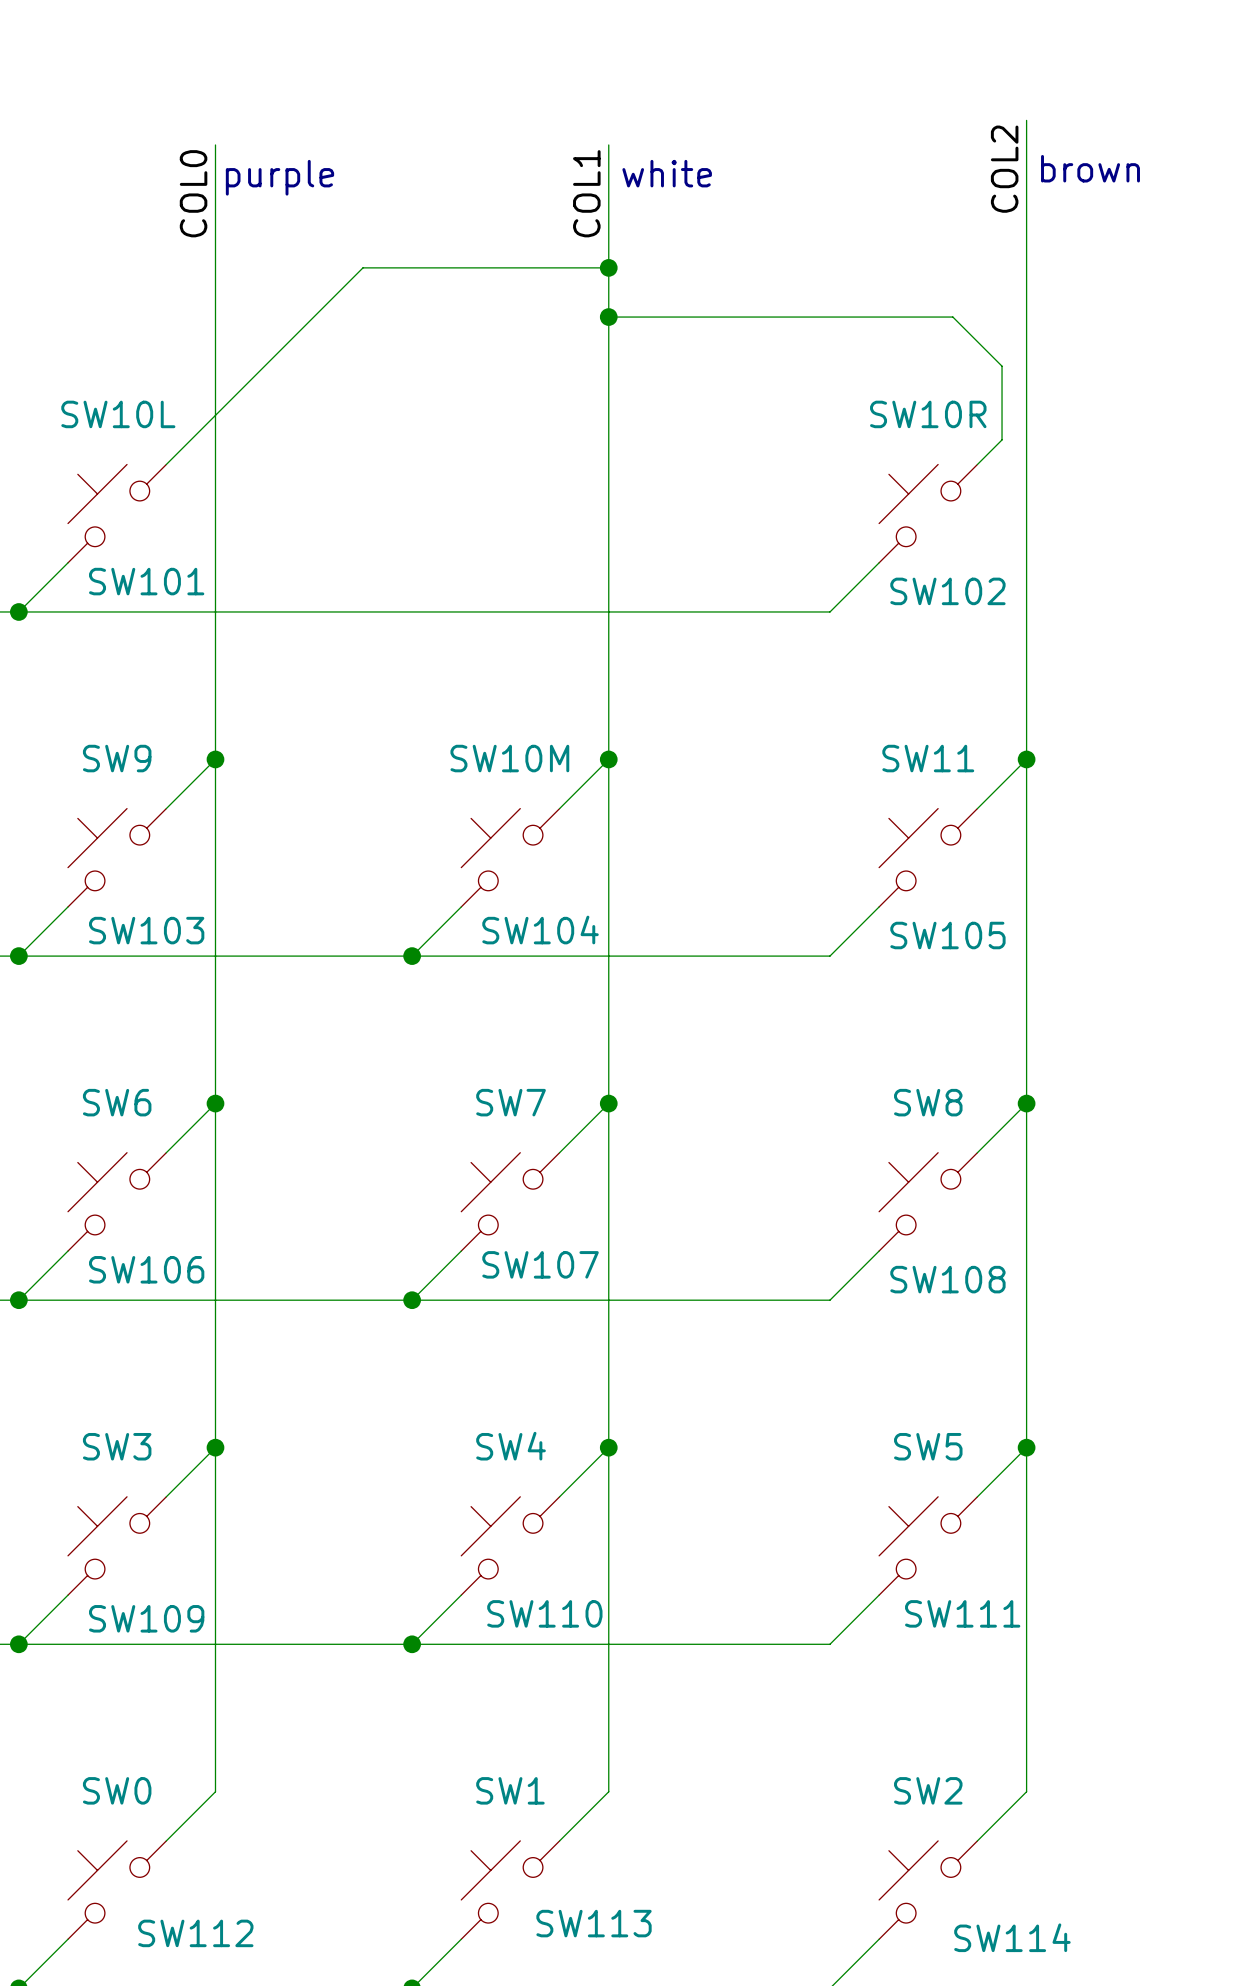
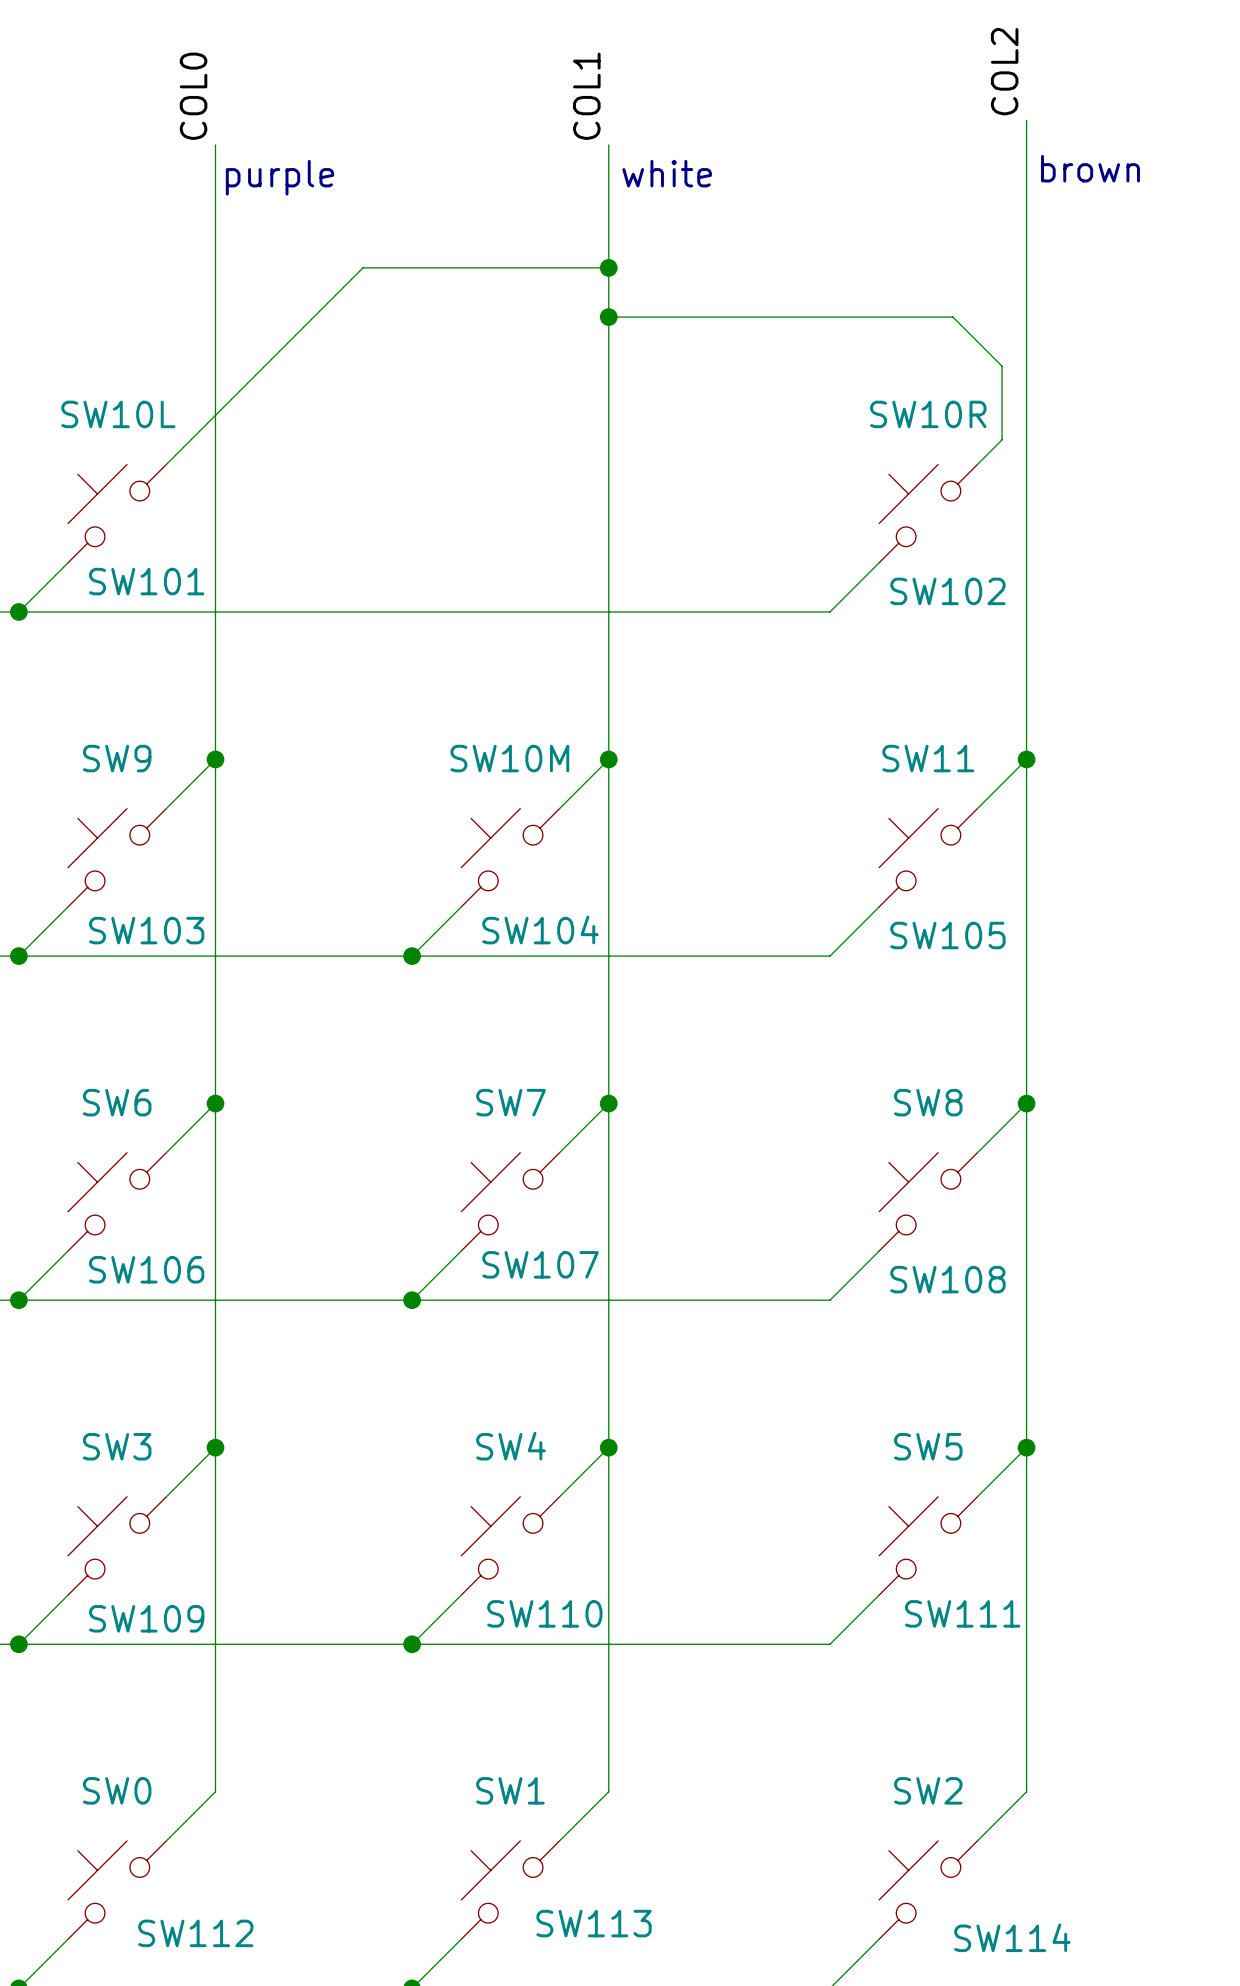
label position: COL2 (1004, 169) -> COL2 (1004, 71)
label position: COL0 (193, 193) -> COL0 (193, 96)
label position: COL1 (586, 193) -> COL1 (586, 96)

